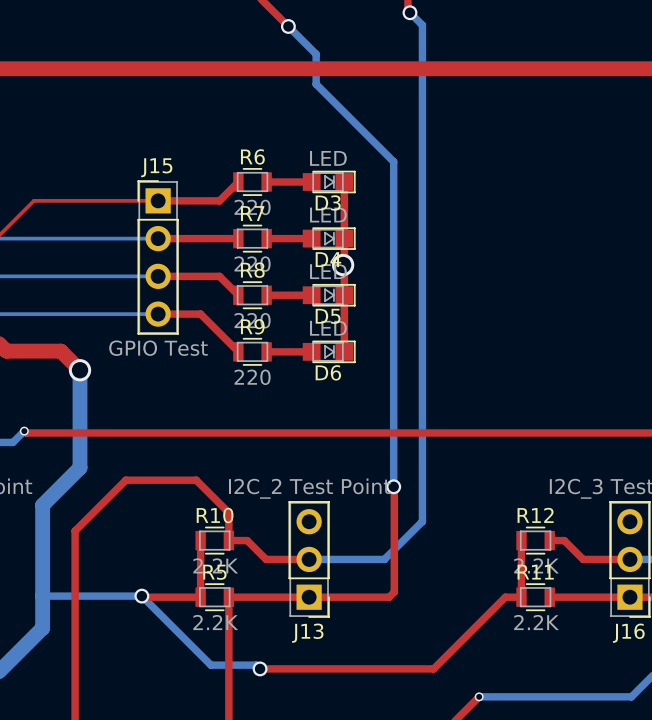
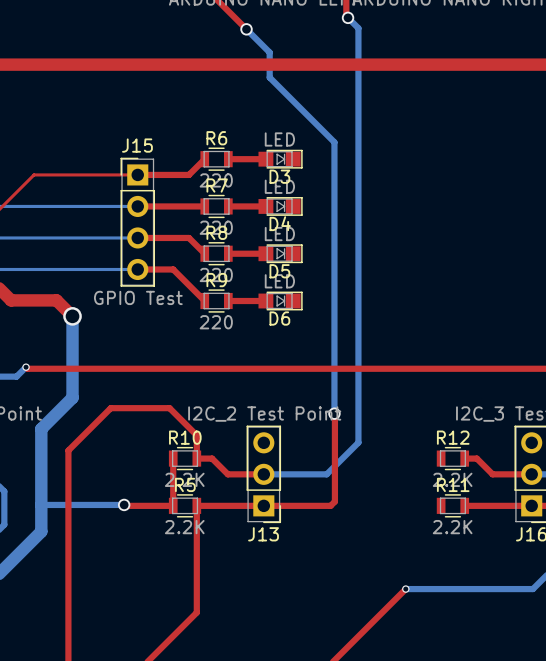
top track: (344, 181) (344, 351) -> none
via: (343, 265) -> none
top track: (521, 540) (521, 597) (505, 597) (433, 668) (260, 668) -> none
bottom track: (141, 596) (210, 665) (256, 665) (260, 668) -> none
via: (260, 668) -> none

